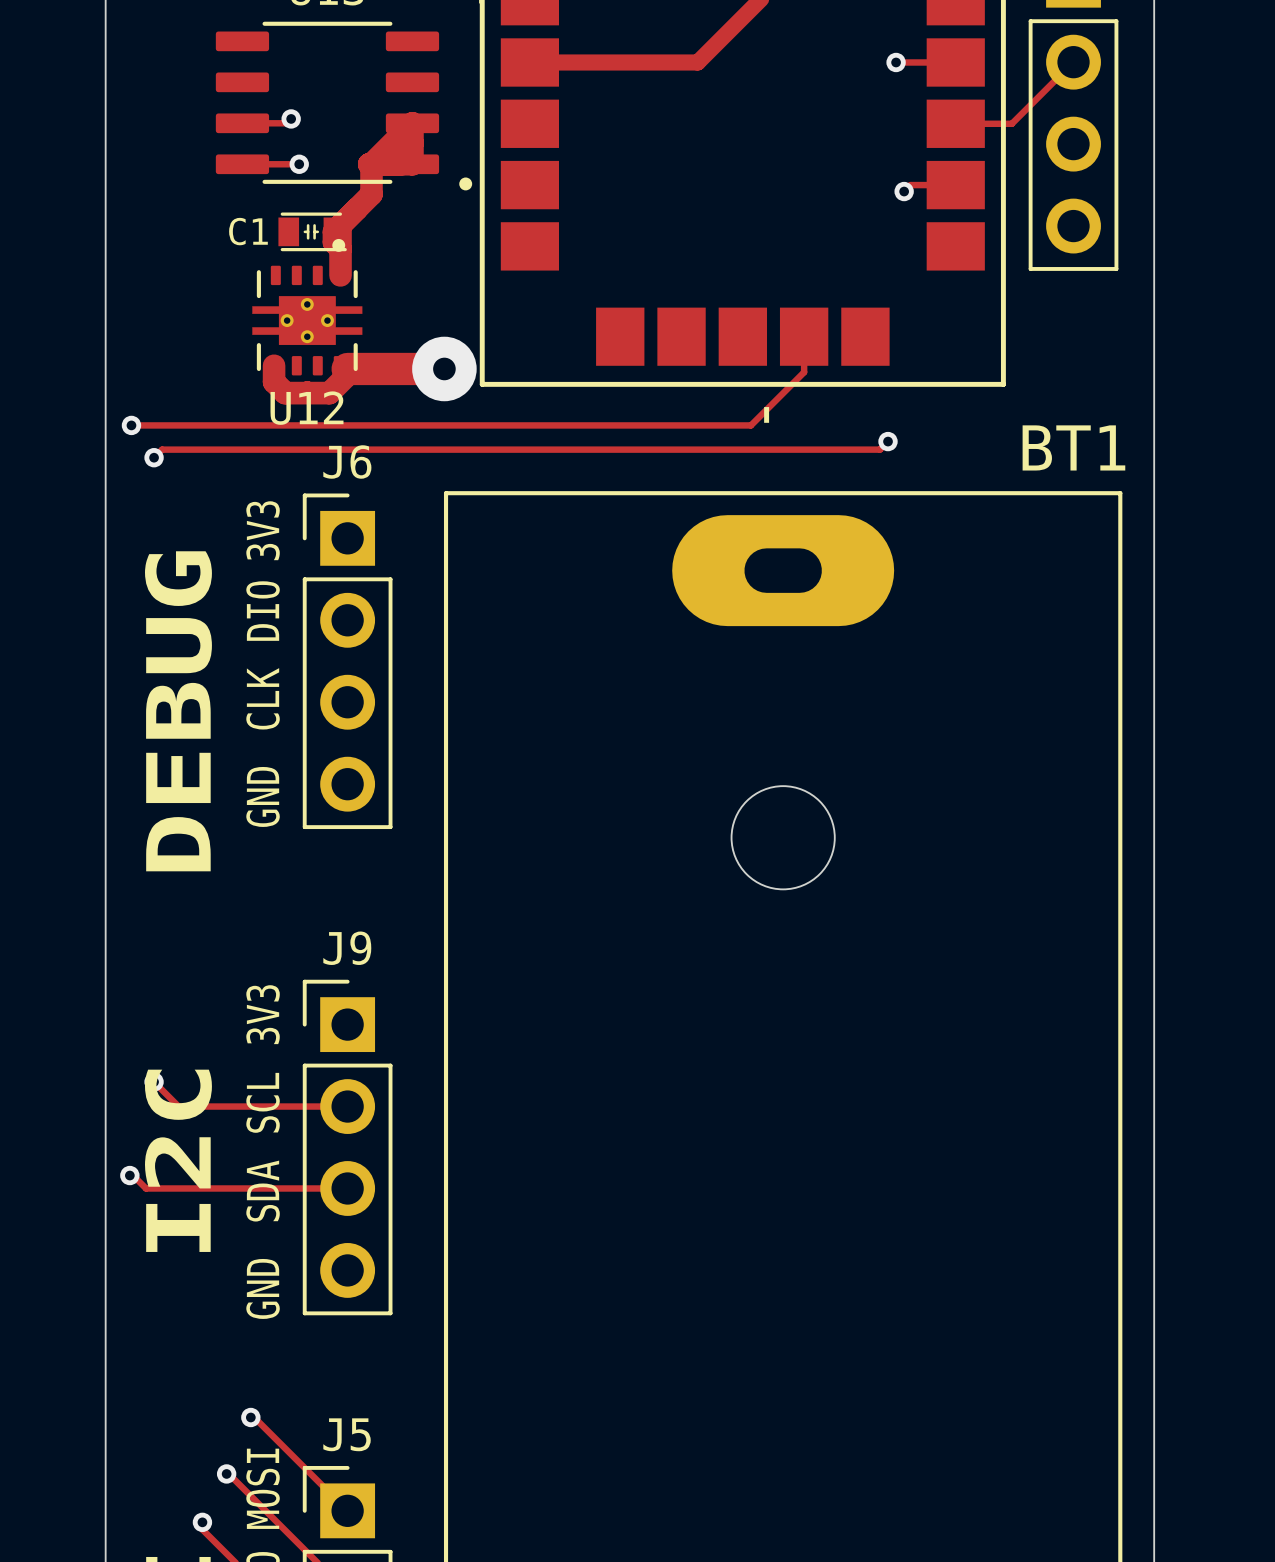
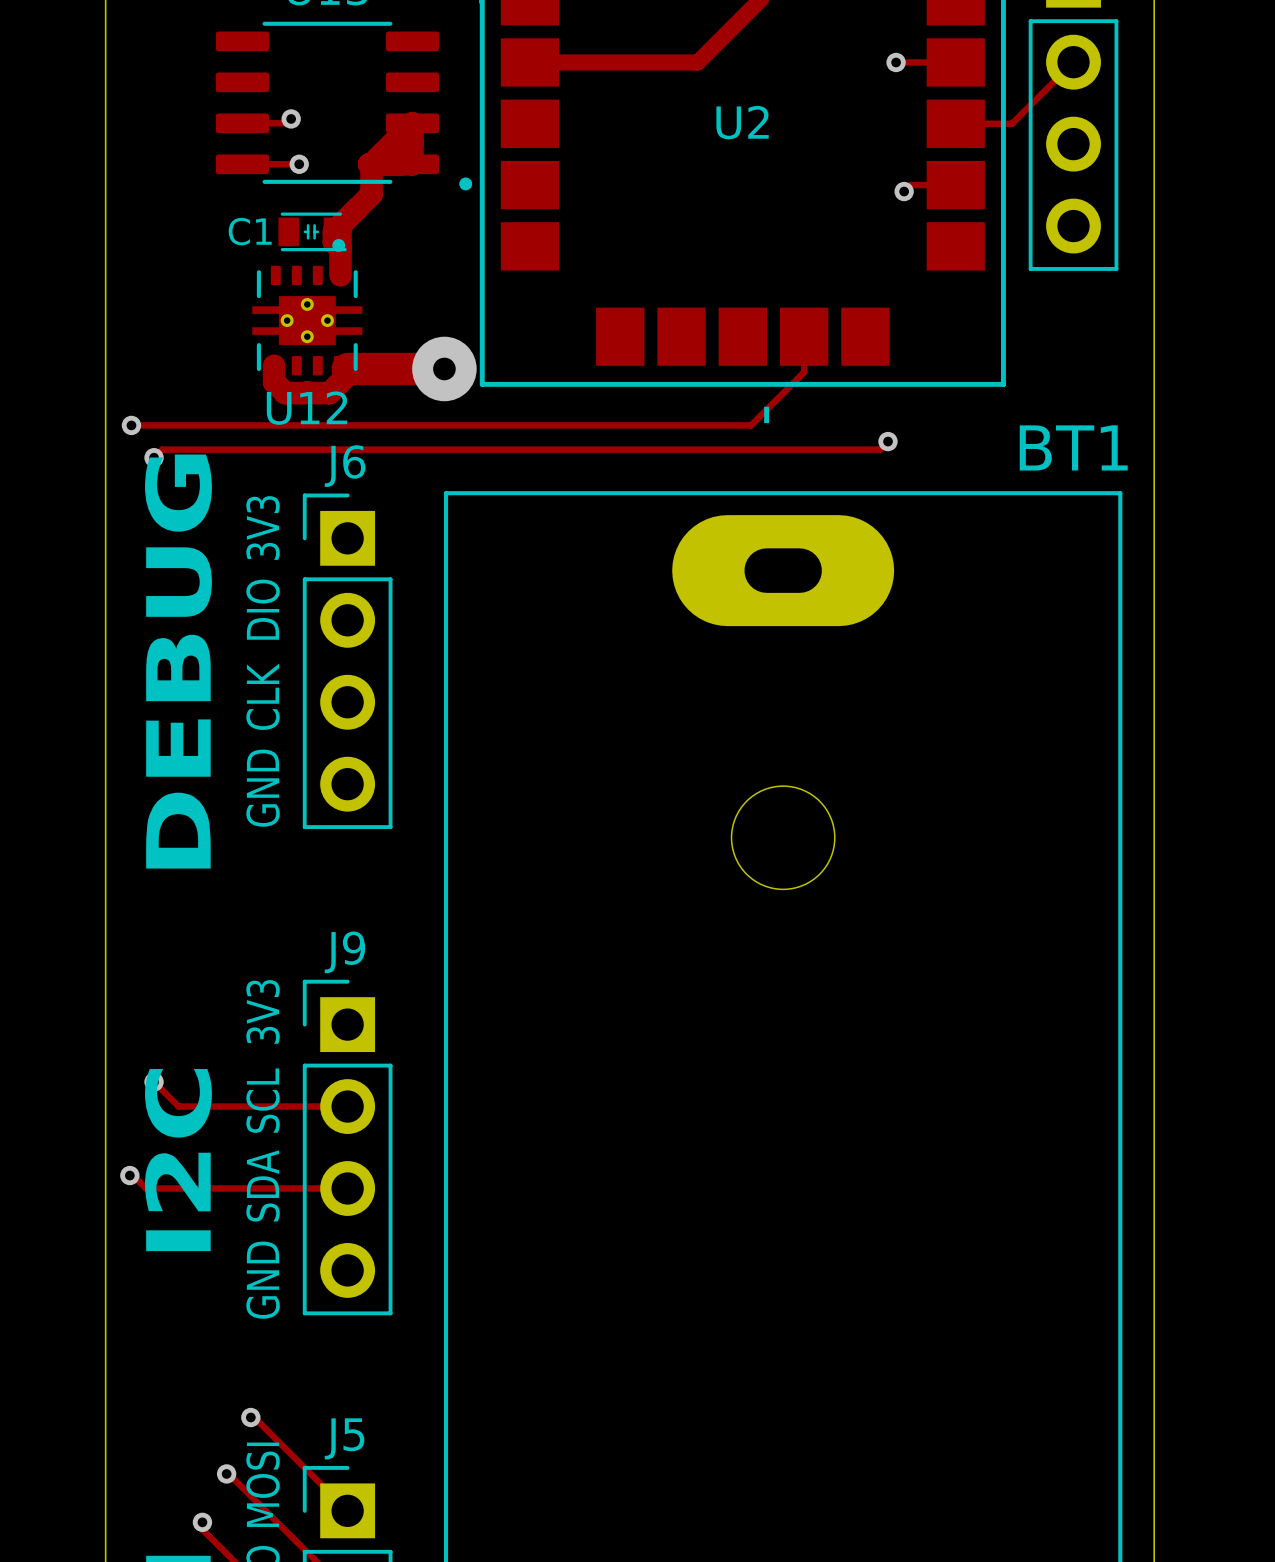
U2 name: none -> U2 (742, 122)

